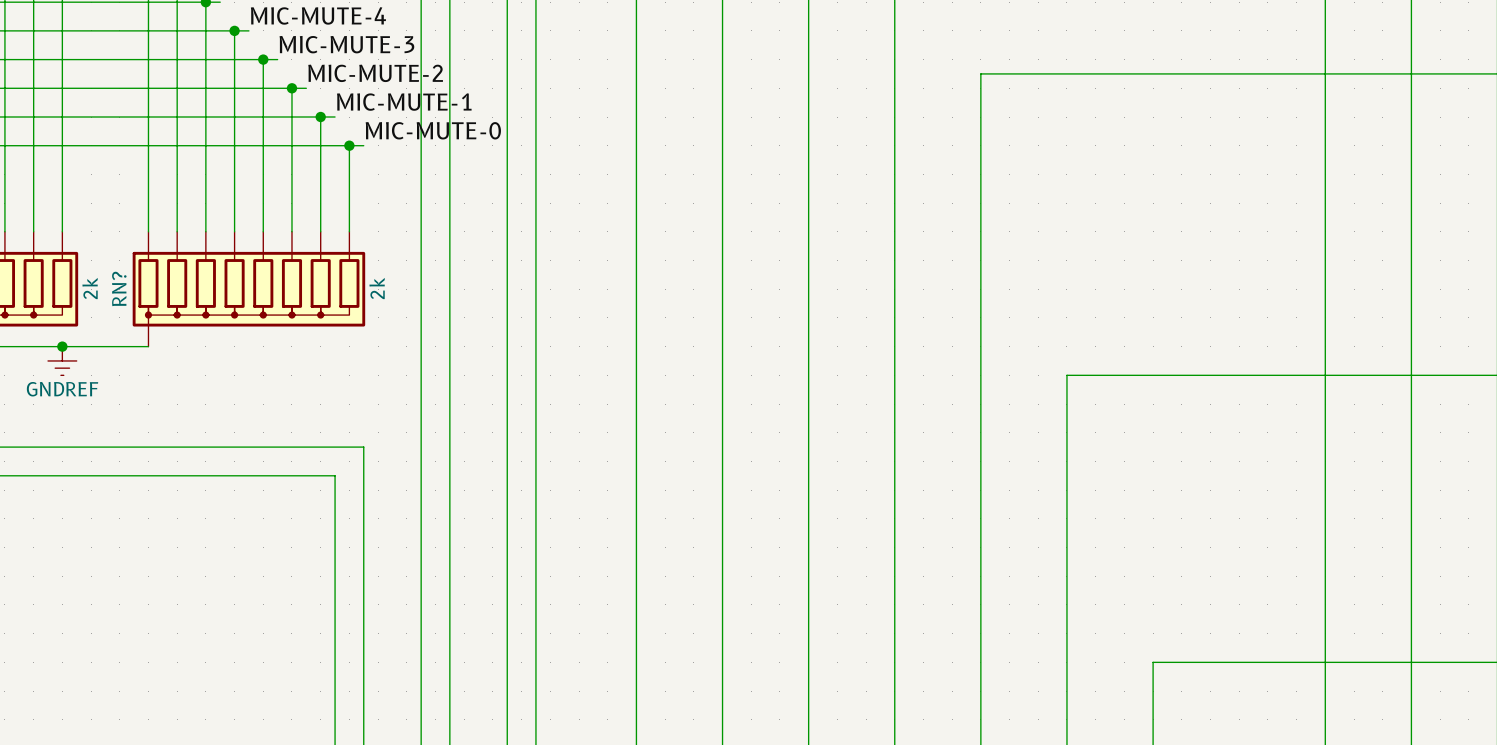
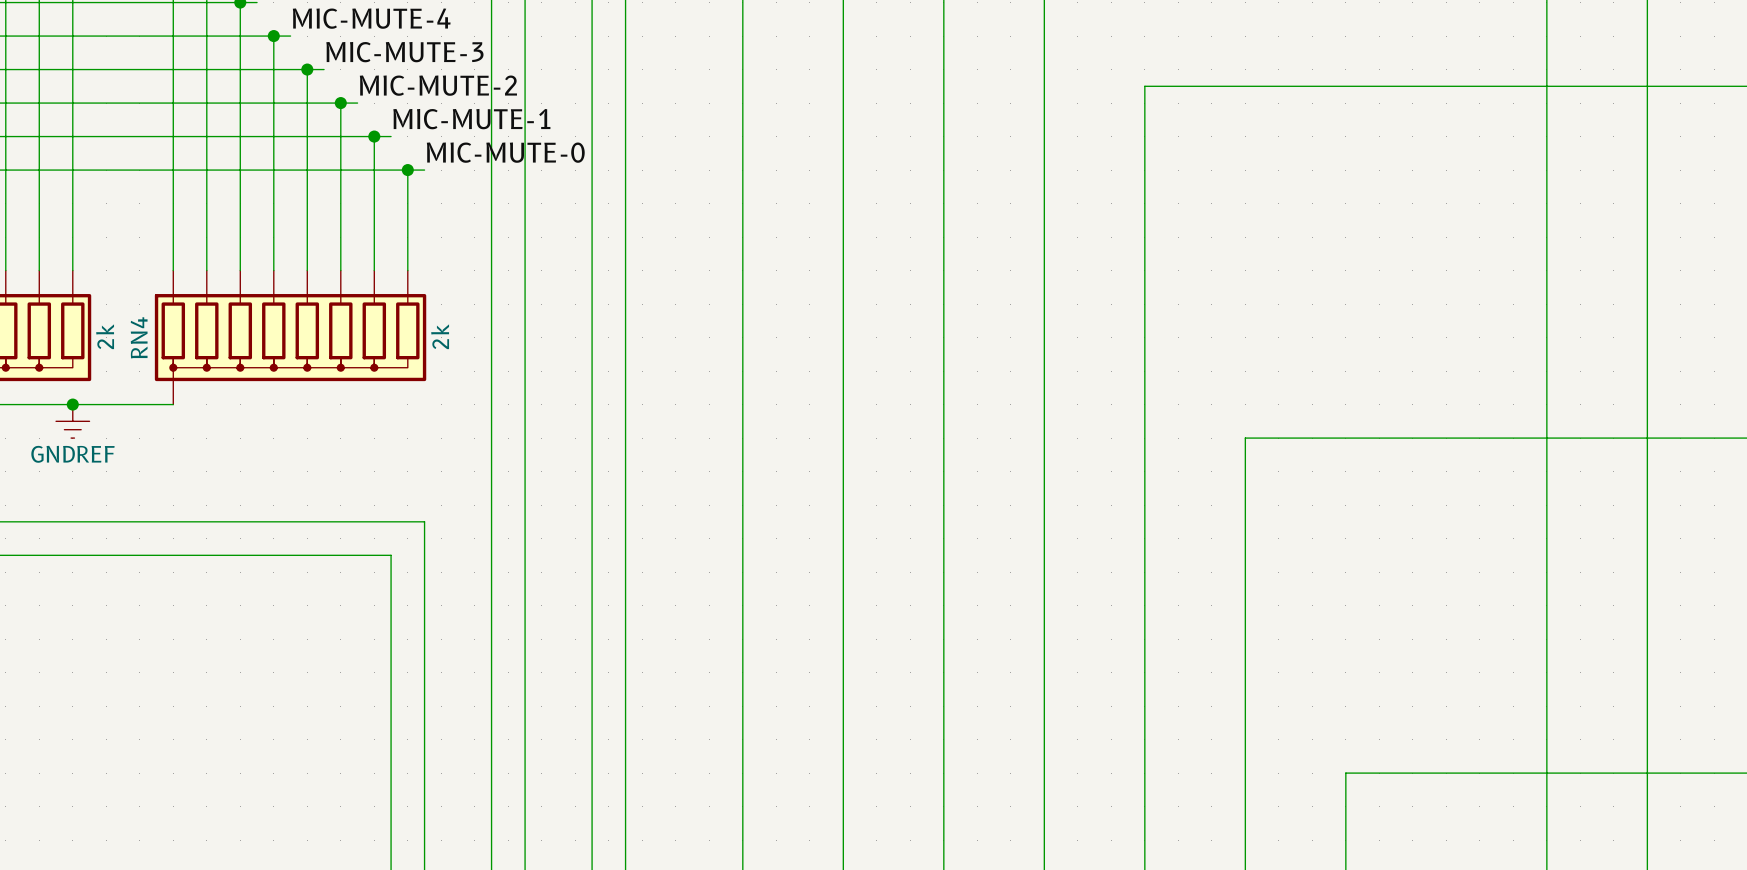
RN? name: RN? (119, 288) -> RN4 (139, 337)

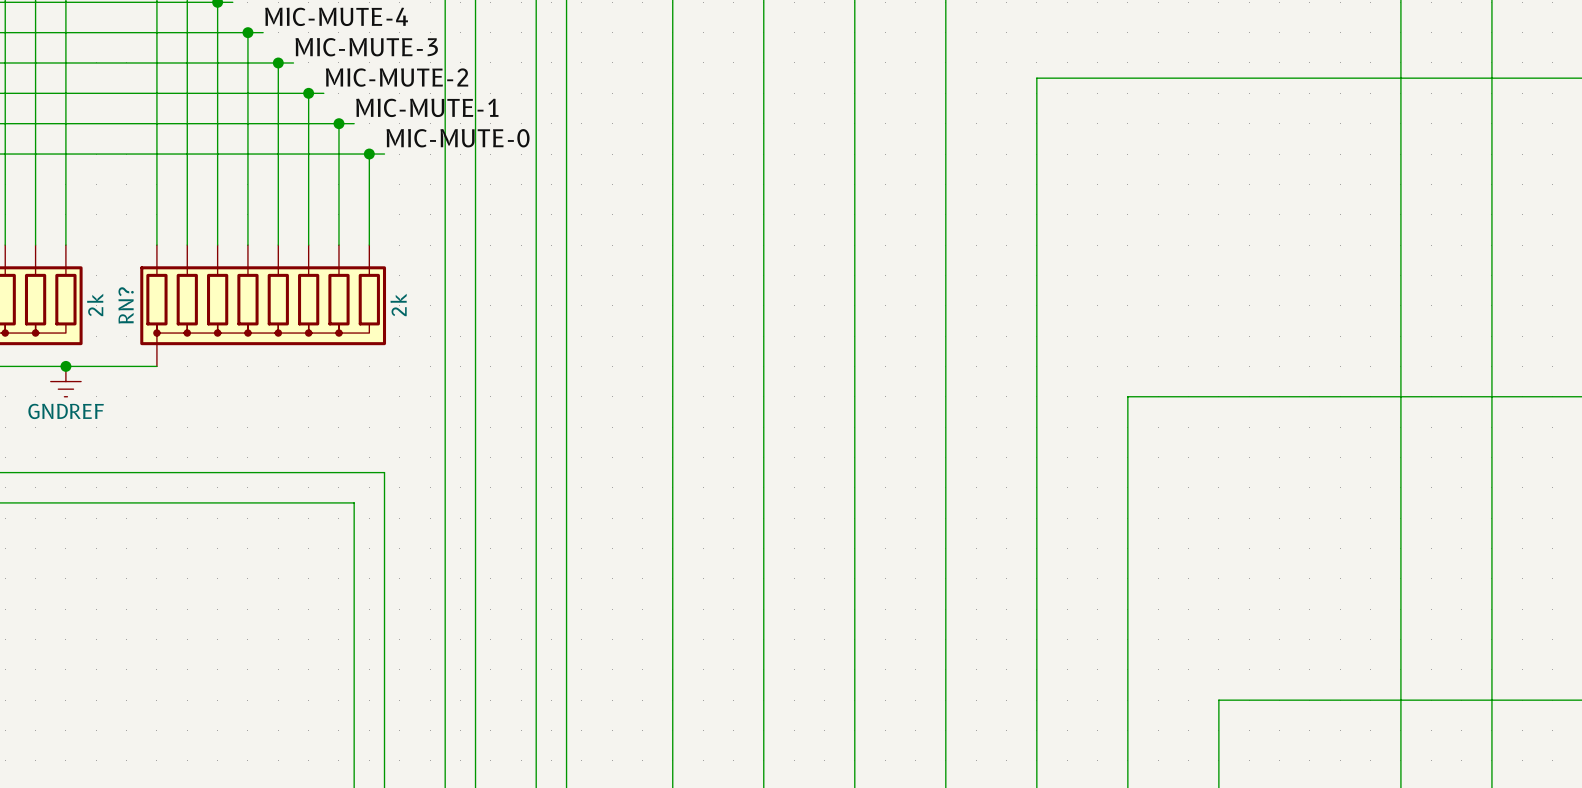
RN4 name: RN4 (139, 337) -> RN? (126, 305)

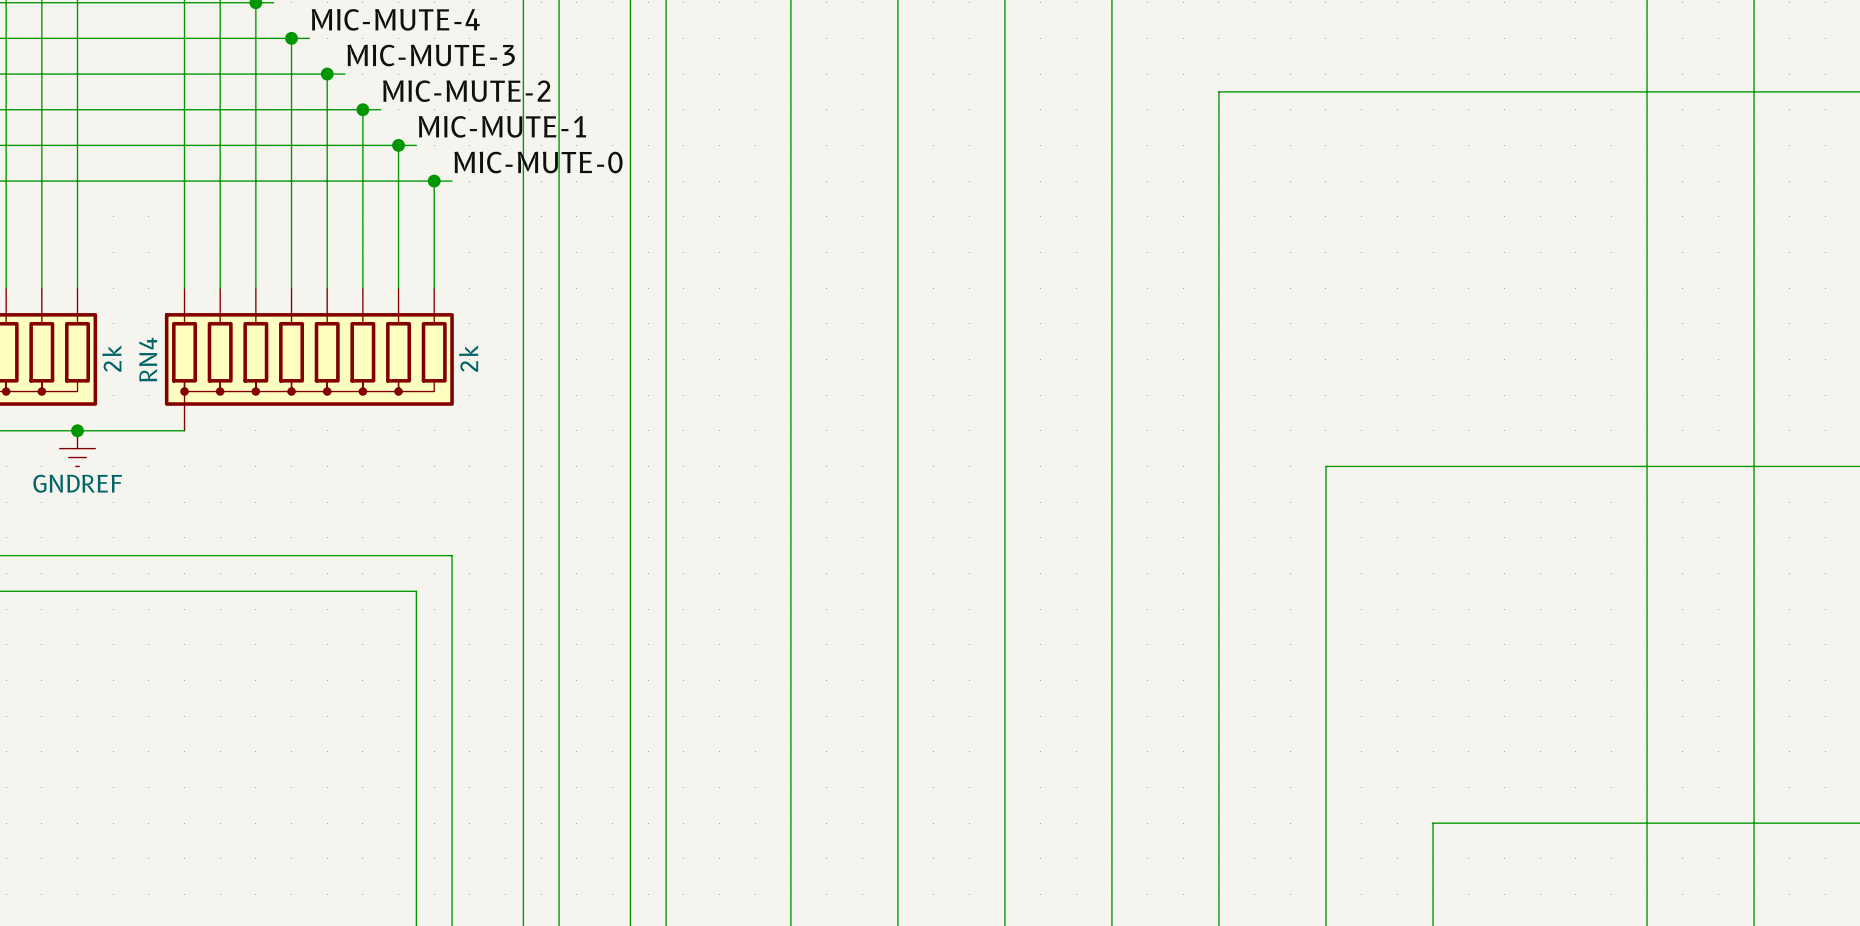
RN? name: RN? (126, 305) -> RN4 (148, 359)

